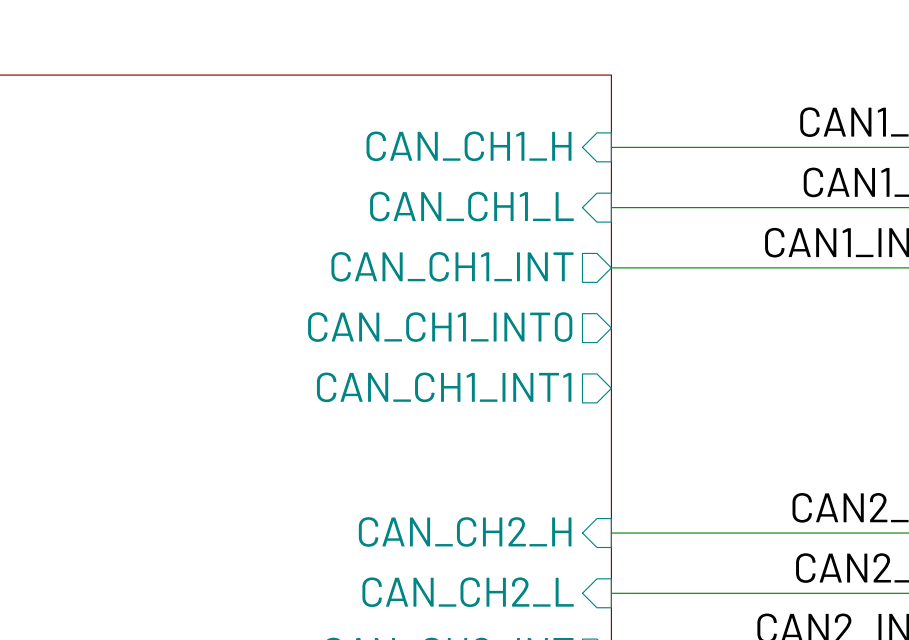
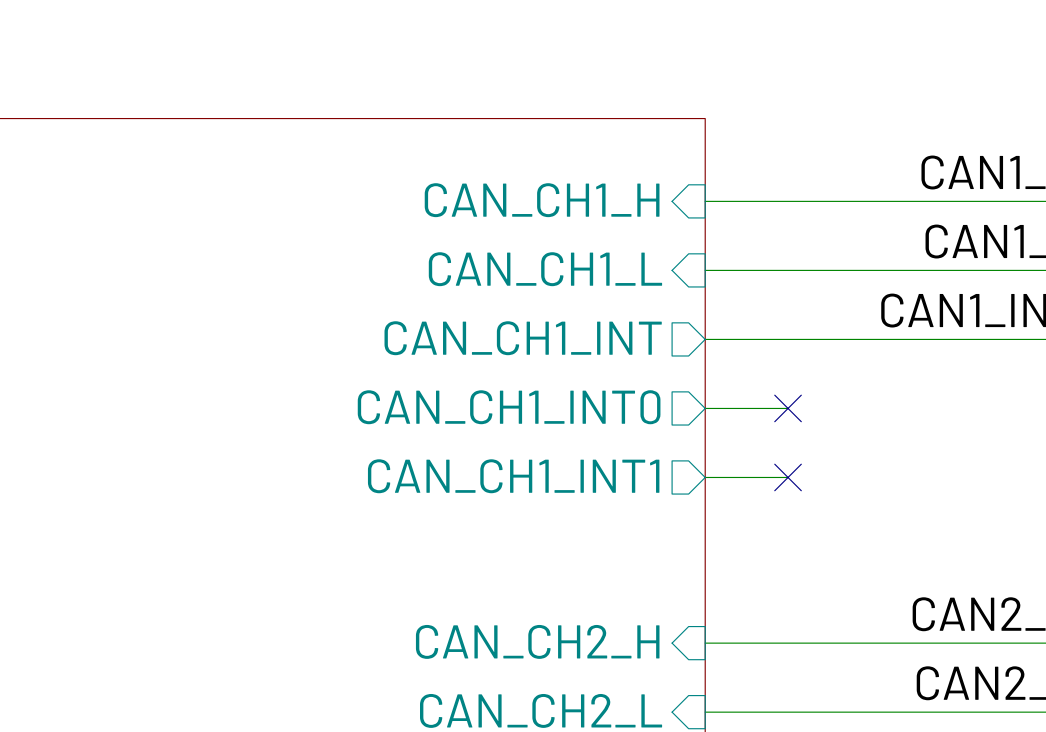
wire: none -> (705, 408) (788, 408)
no-connect mark: none -> (788, 408)
wire: none -> (705, 477) (788, 477)
no-connect mark: none -> (788, 477)

